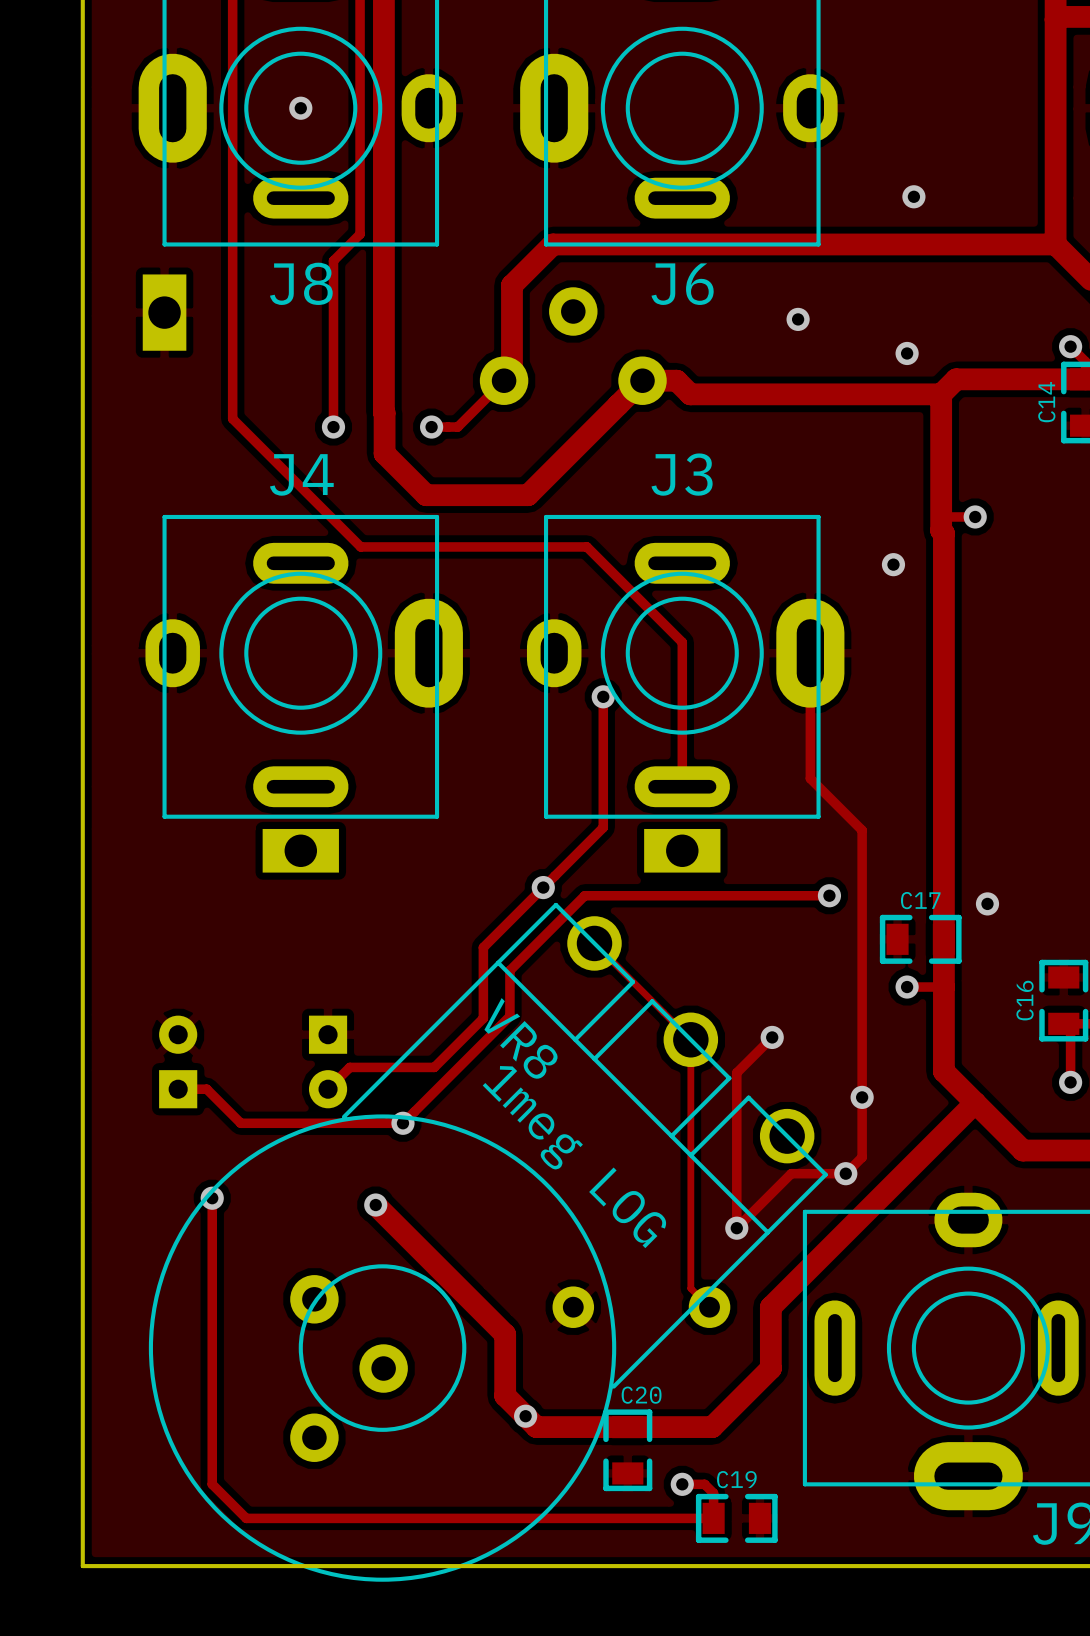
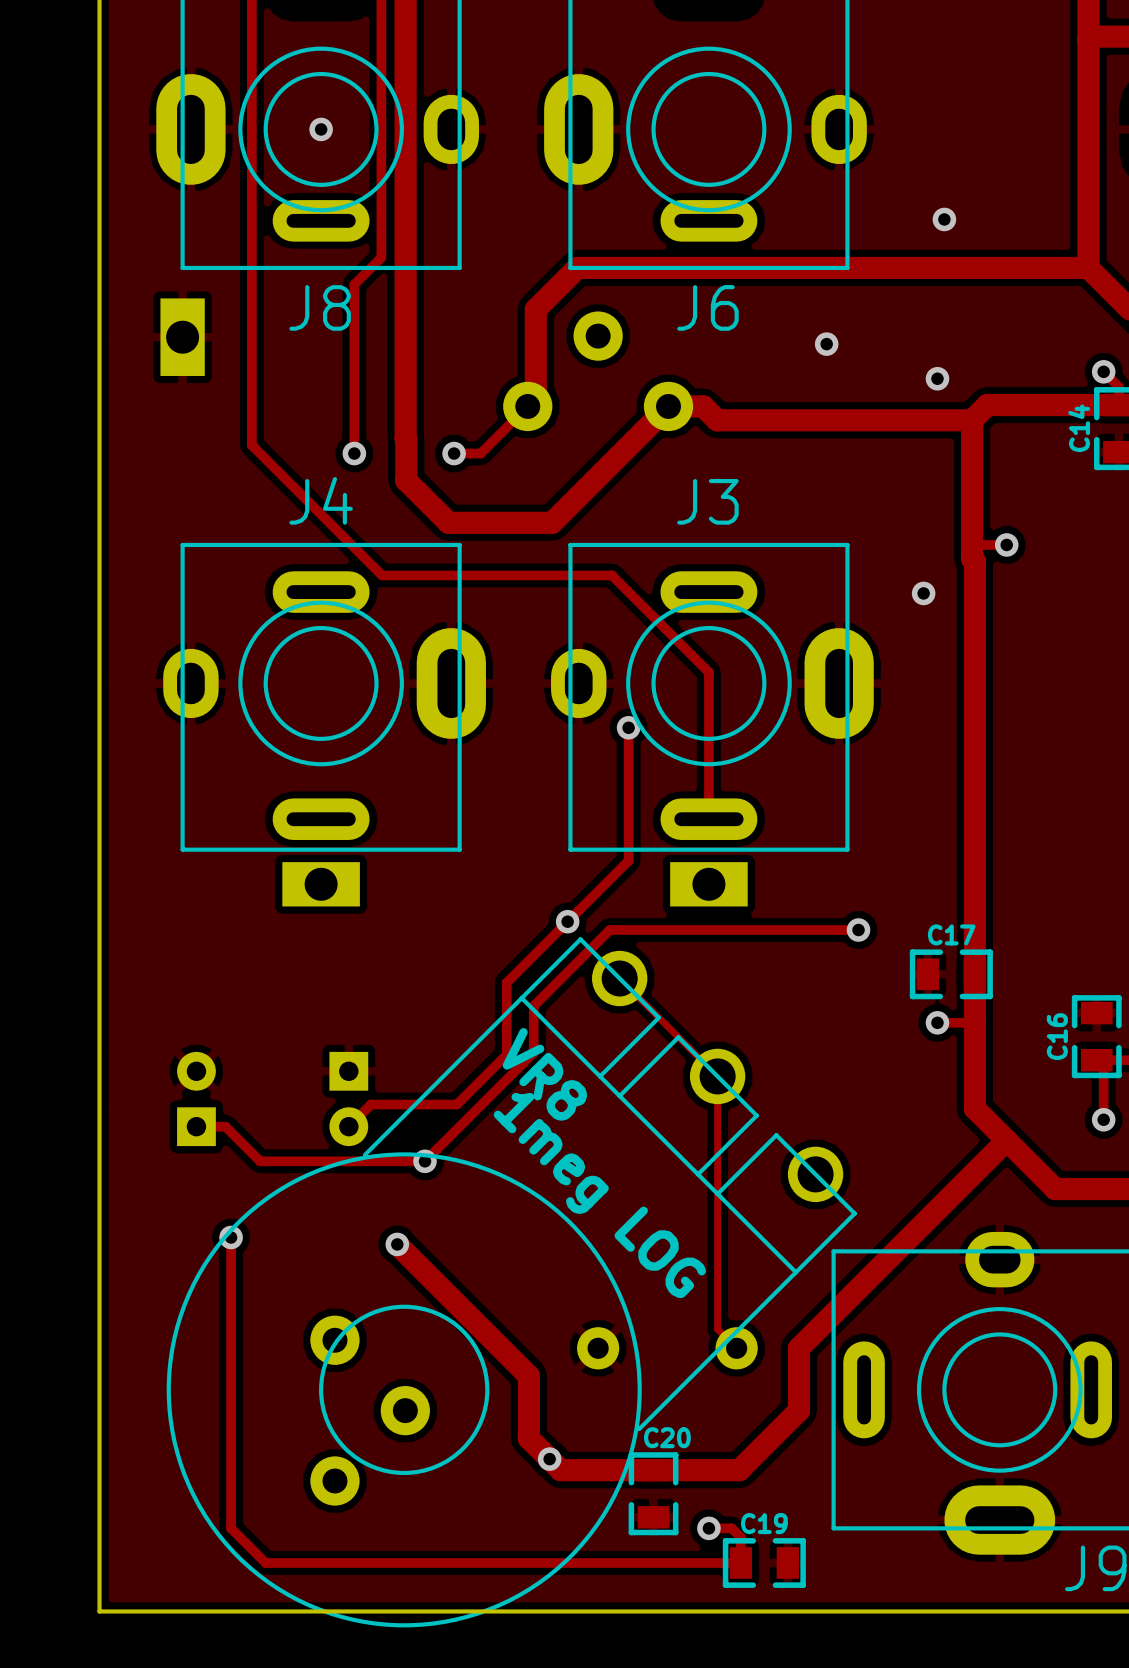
track: (810, 653) (810, 778) (862, 830) (862, 1157) (845, 1173) (791, 1173) (736, 1228) (736, 1072) (772, 1037) -> none
via: (987, 903) -> none
via: (772, 1037) -> none
via: (862, 1097) -> none
via: (845, 1173) -> none
via: (736, 1228) -> none

